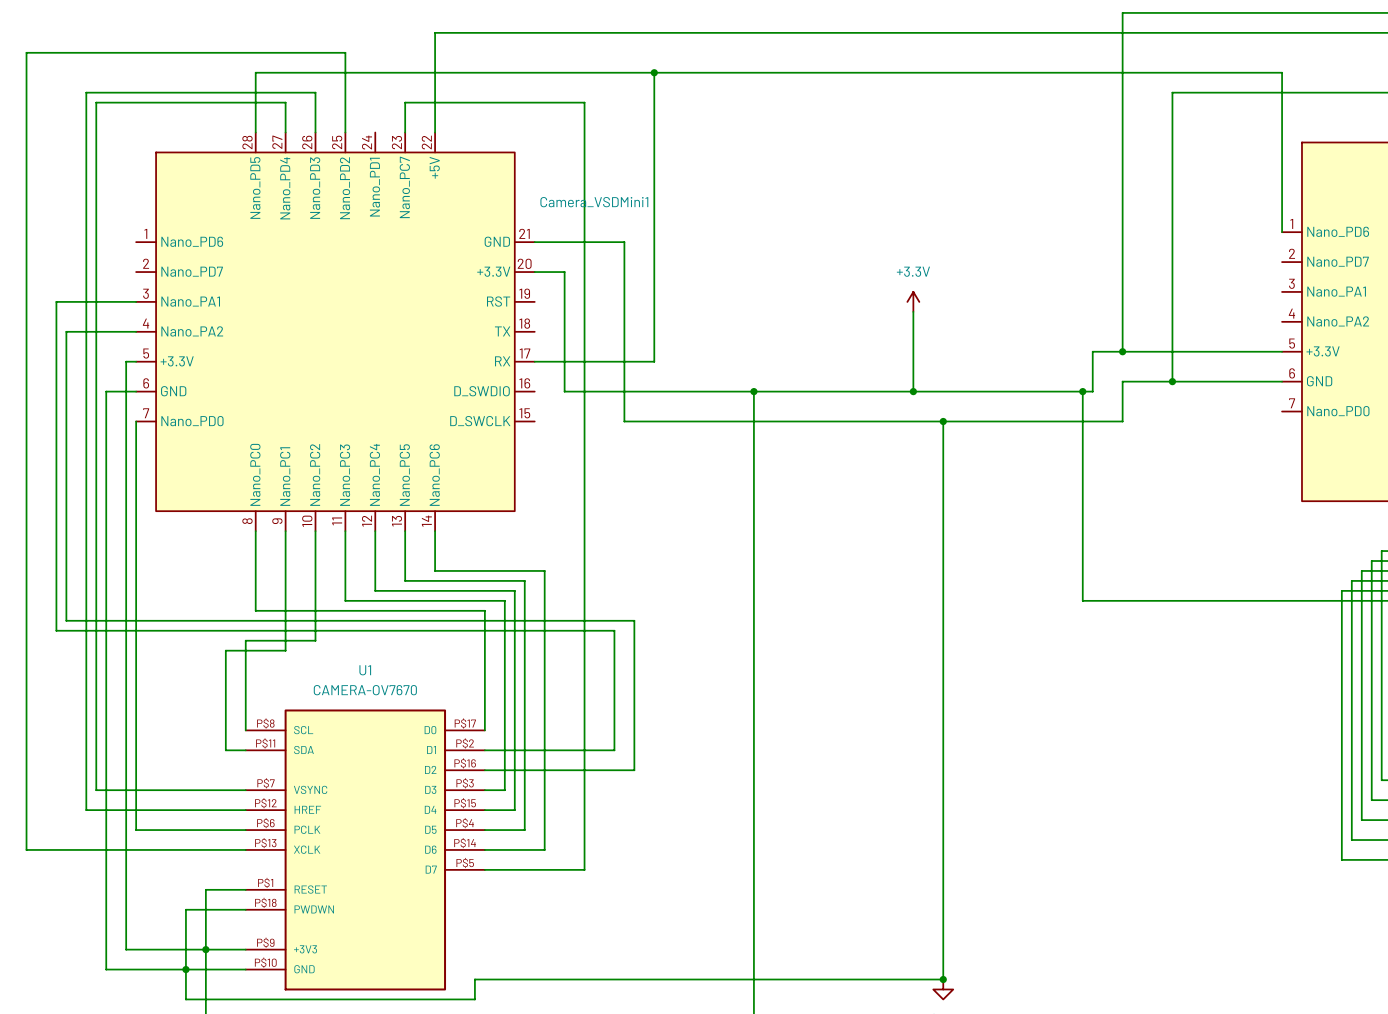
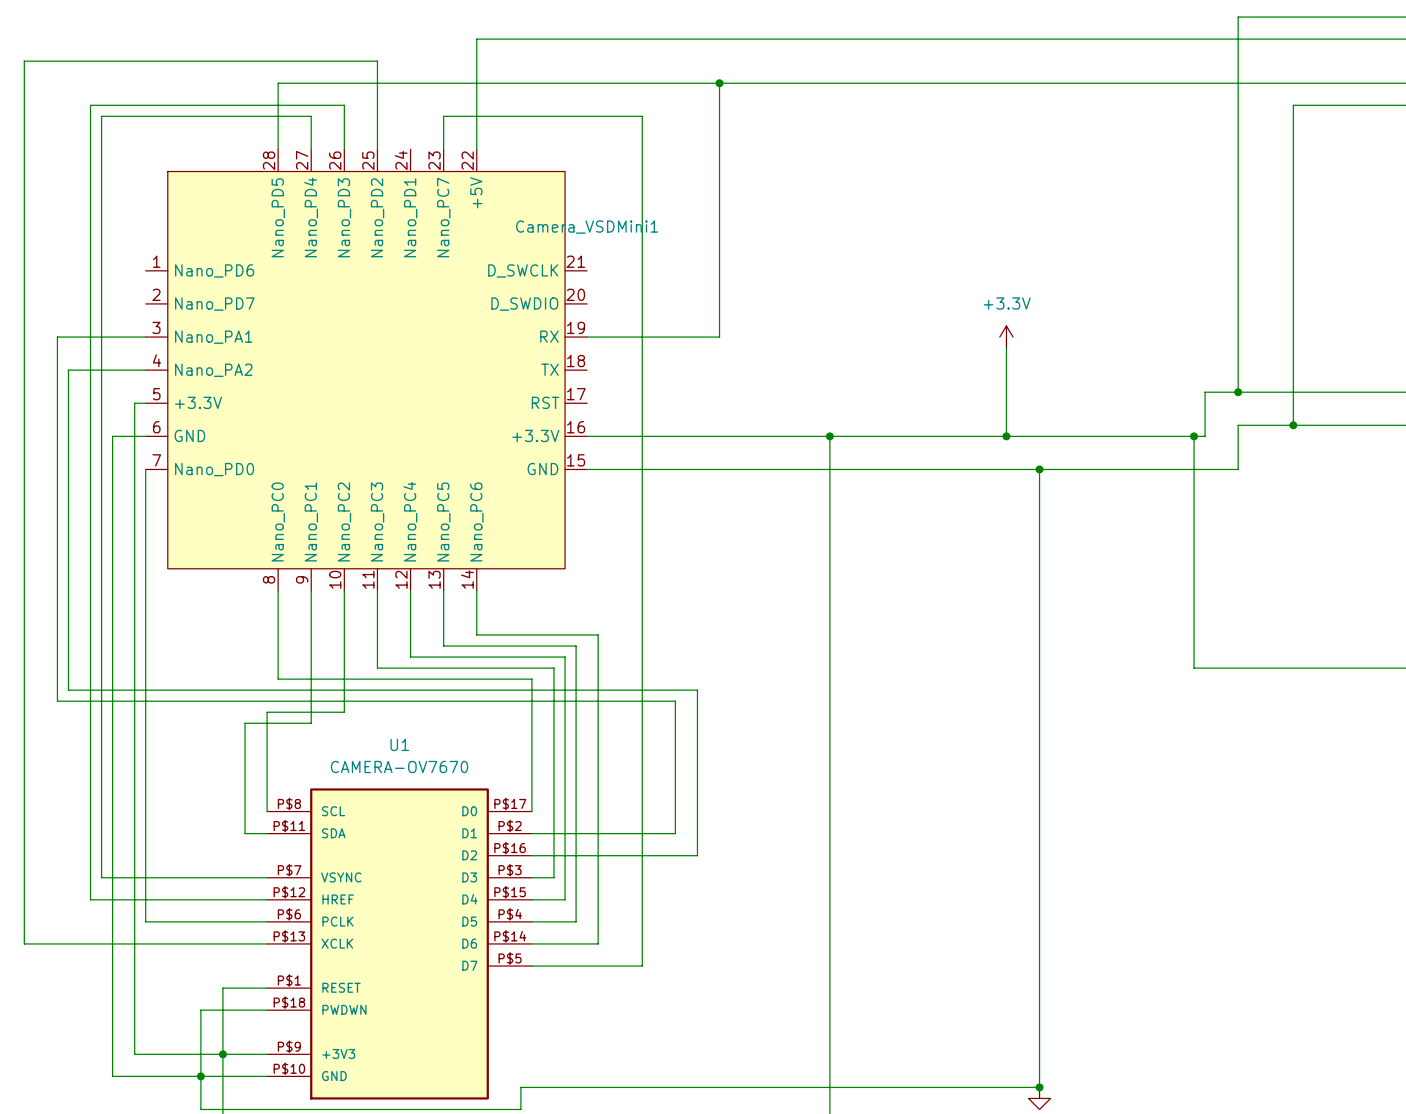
Camera_VSDMini1 name position: Camera_VSDMini1 (594, 202) -> Camera_VSDMini1 (587, 227)
Camera_VSDMini1 pin name: GND (497, 241) -> D_SWCLK (523, 270)
wire: (534, 242) (624, 242) (624, 421) -> (587, 469) (686, 469)
Camera_VSDMini1 pin name: +3.3V (493, 271) -> D_SWDIO (524, 304)
wire: (534, 272) (564, 272) (564, 391) -> (587, 436) (620, 436)
Camera_VSDMini1 pin name: RST (498, 301) -> RX (549, 336)
wire: (654, 301) (654, 361) (534, 361) -> (719, 337) (587, 337)
Camera_VSDMini1 pin name: RX (502, 361) -> RST (545, 402)
Camera_VSDMini1 pin name: D_SWDIO (482, 391) -> +3.3V (535, 435)
Camera_VSDMini1 pin name: D_SWCLK (480, 421) -> GND (542, 469)

